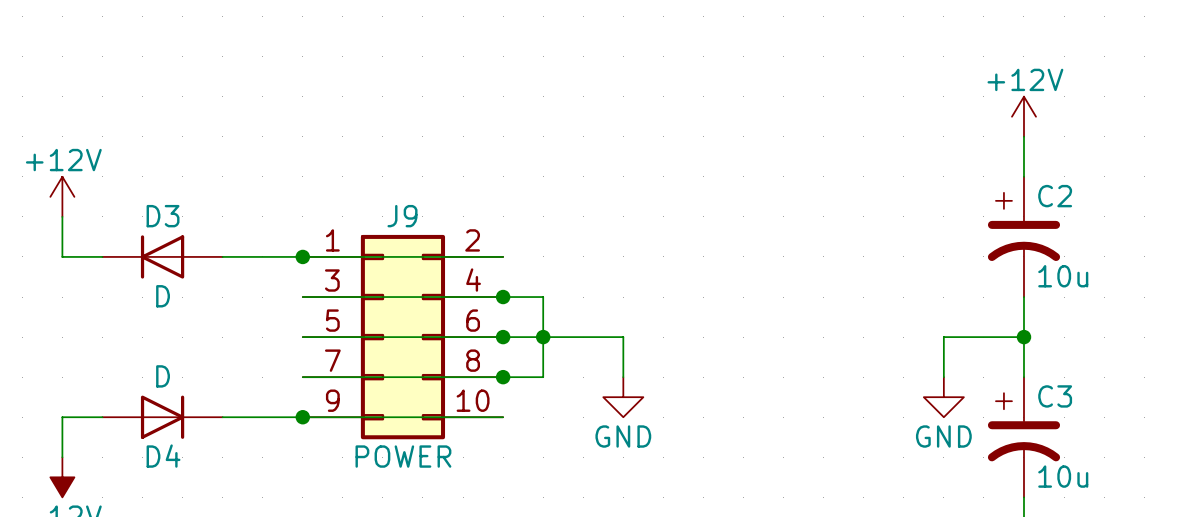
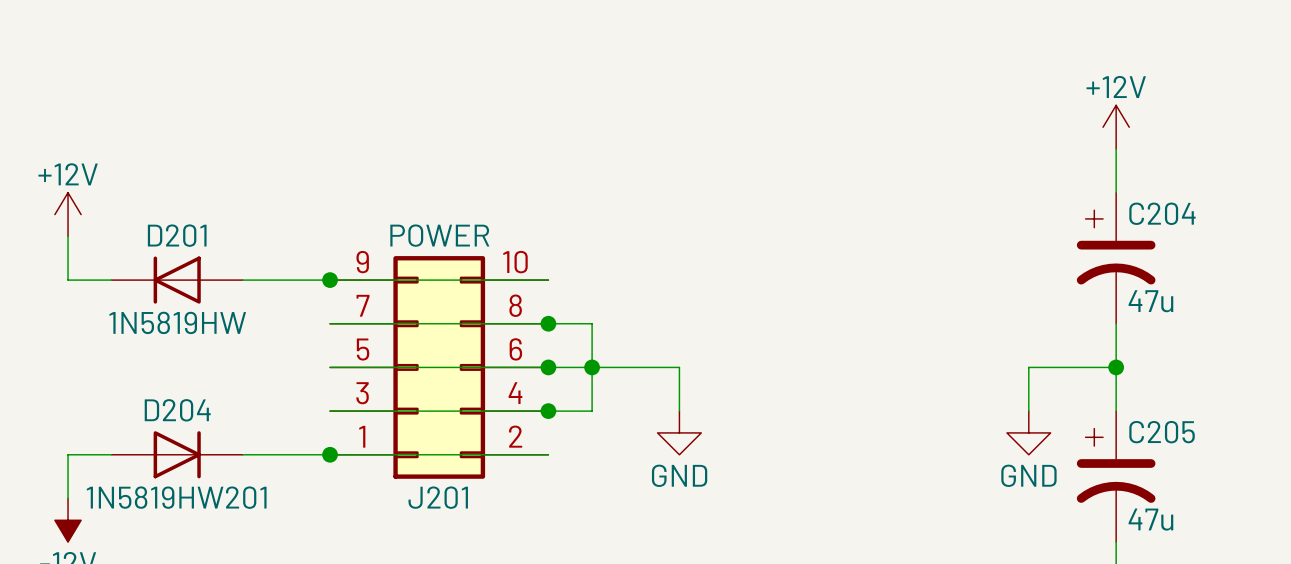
C2 name: C2 (1055, 196) -> C204 (1162, 213)
D3 name: D3 (163, 216) -> D201 (177, 235)
J9 name: J9 (402, 216) -> J201 (438, 497)
C2 value: 10u (1063, 276) -> 47u (1150, 301)
D3 value: D (163, 296) -> 1N5819HW (177, 322)
J9 flip: as is (402, 337) -> up-down (439, 367)
D4 value: D (163, 376) -> D204 (177, 410)
C3 name: C3 (1055, 396) -> C205 (1162, 432)
D4 name: D4 (163, 456) -> 1N5819HW201 (176, 497)
C3 value: 10u (1063, 476) -> 47u (1150, 519)

